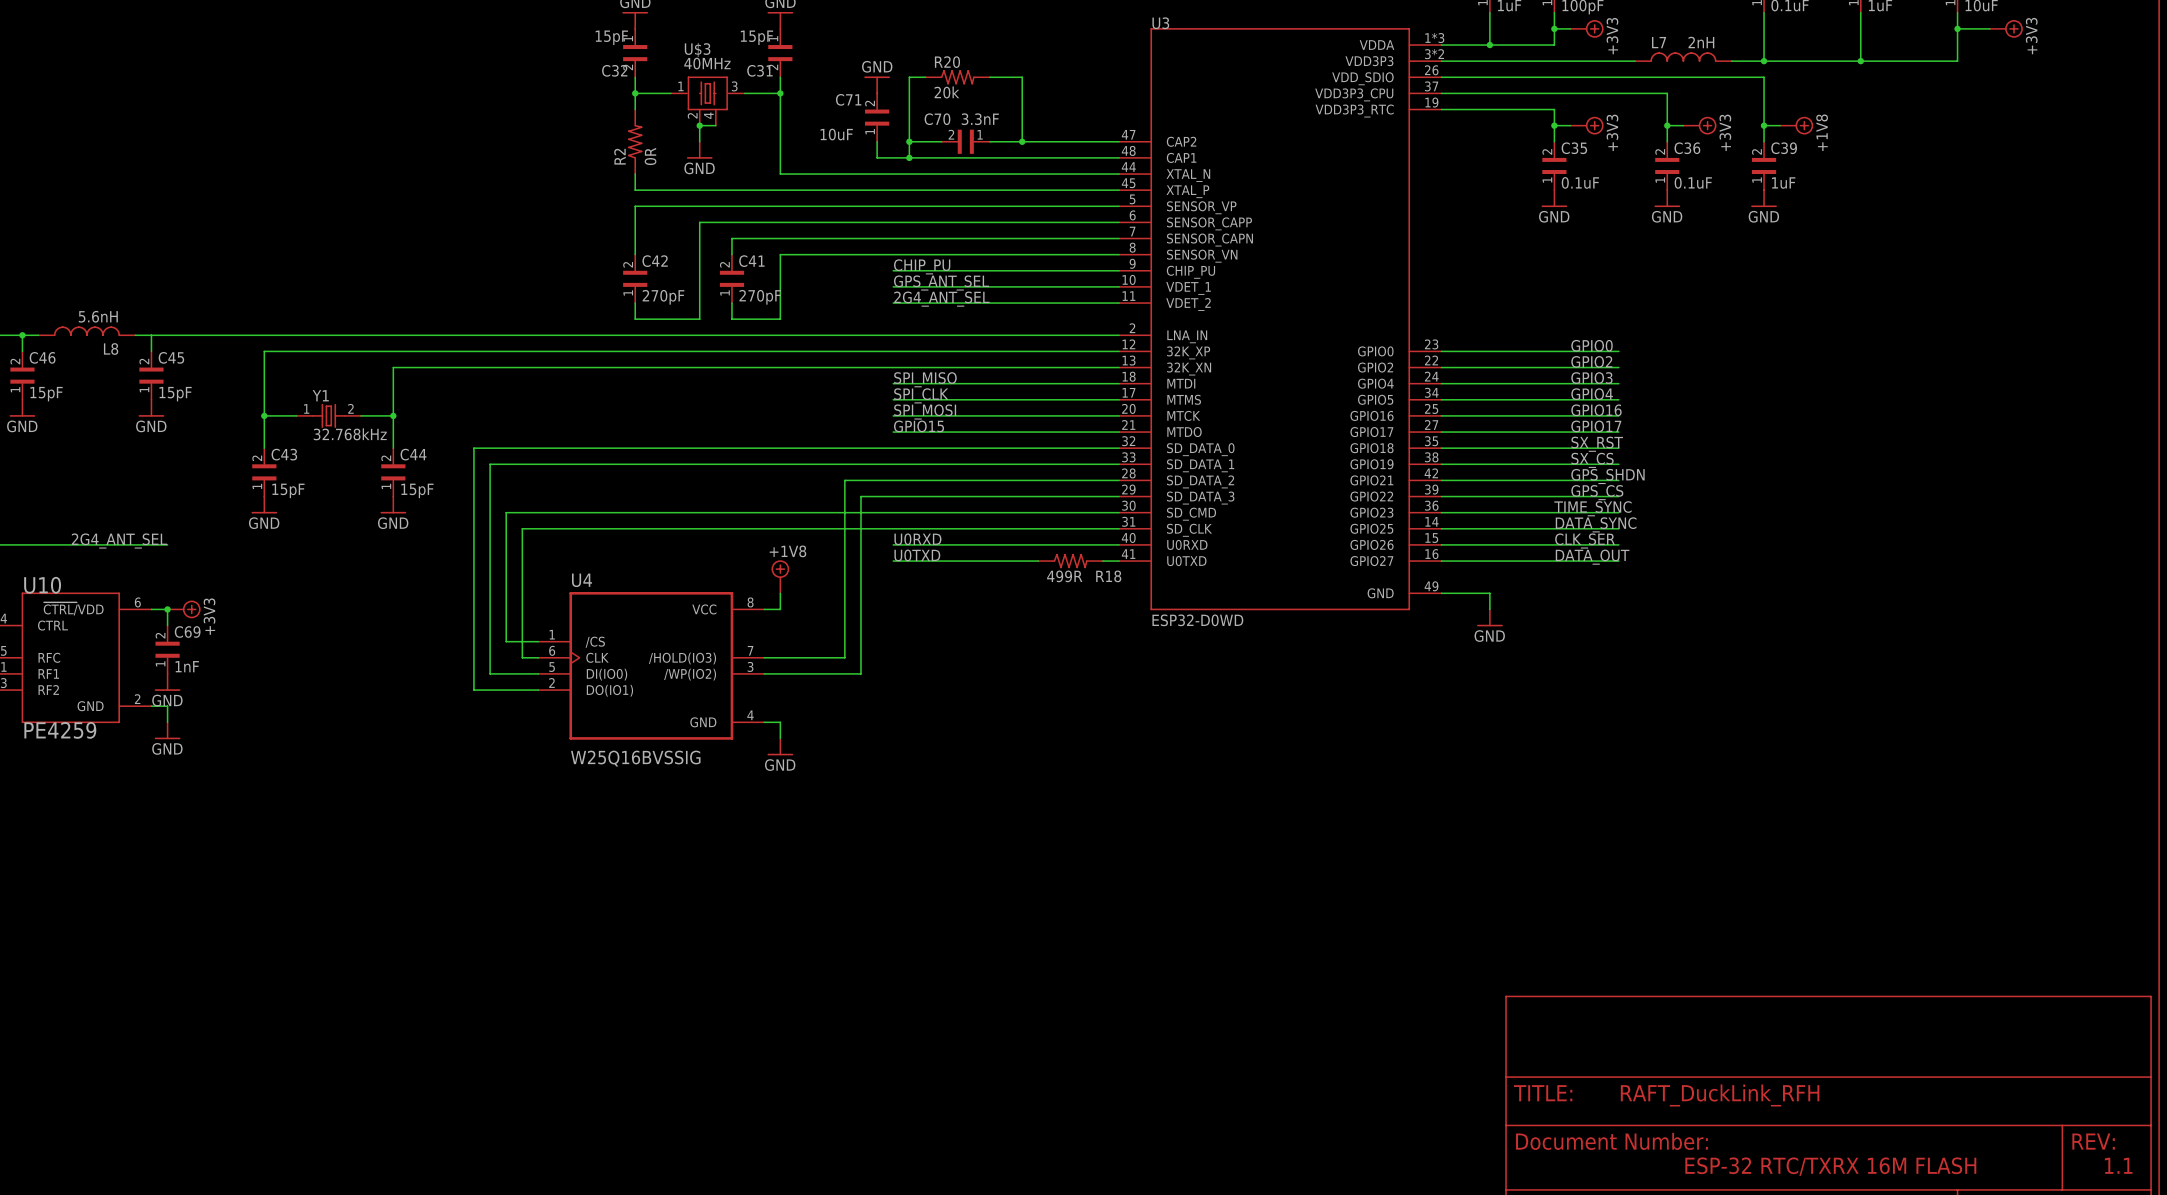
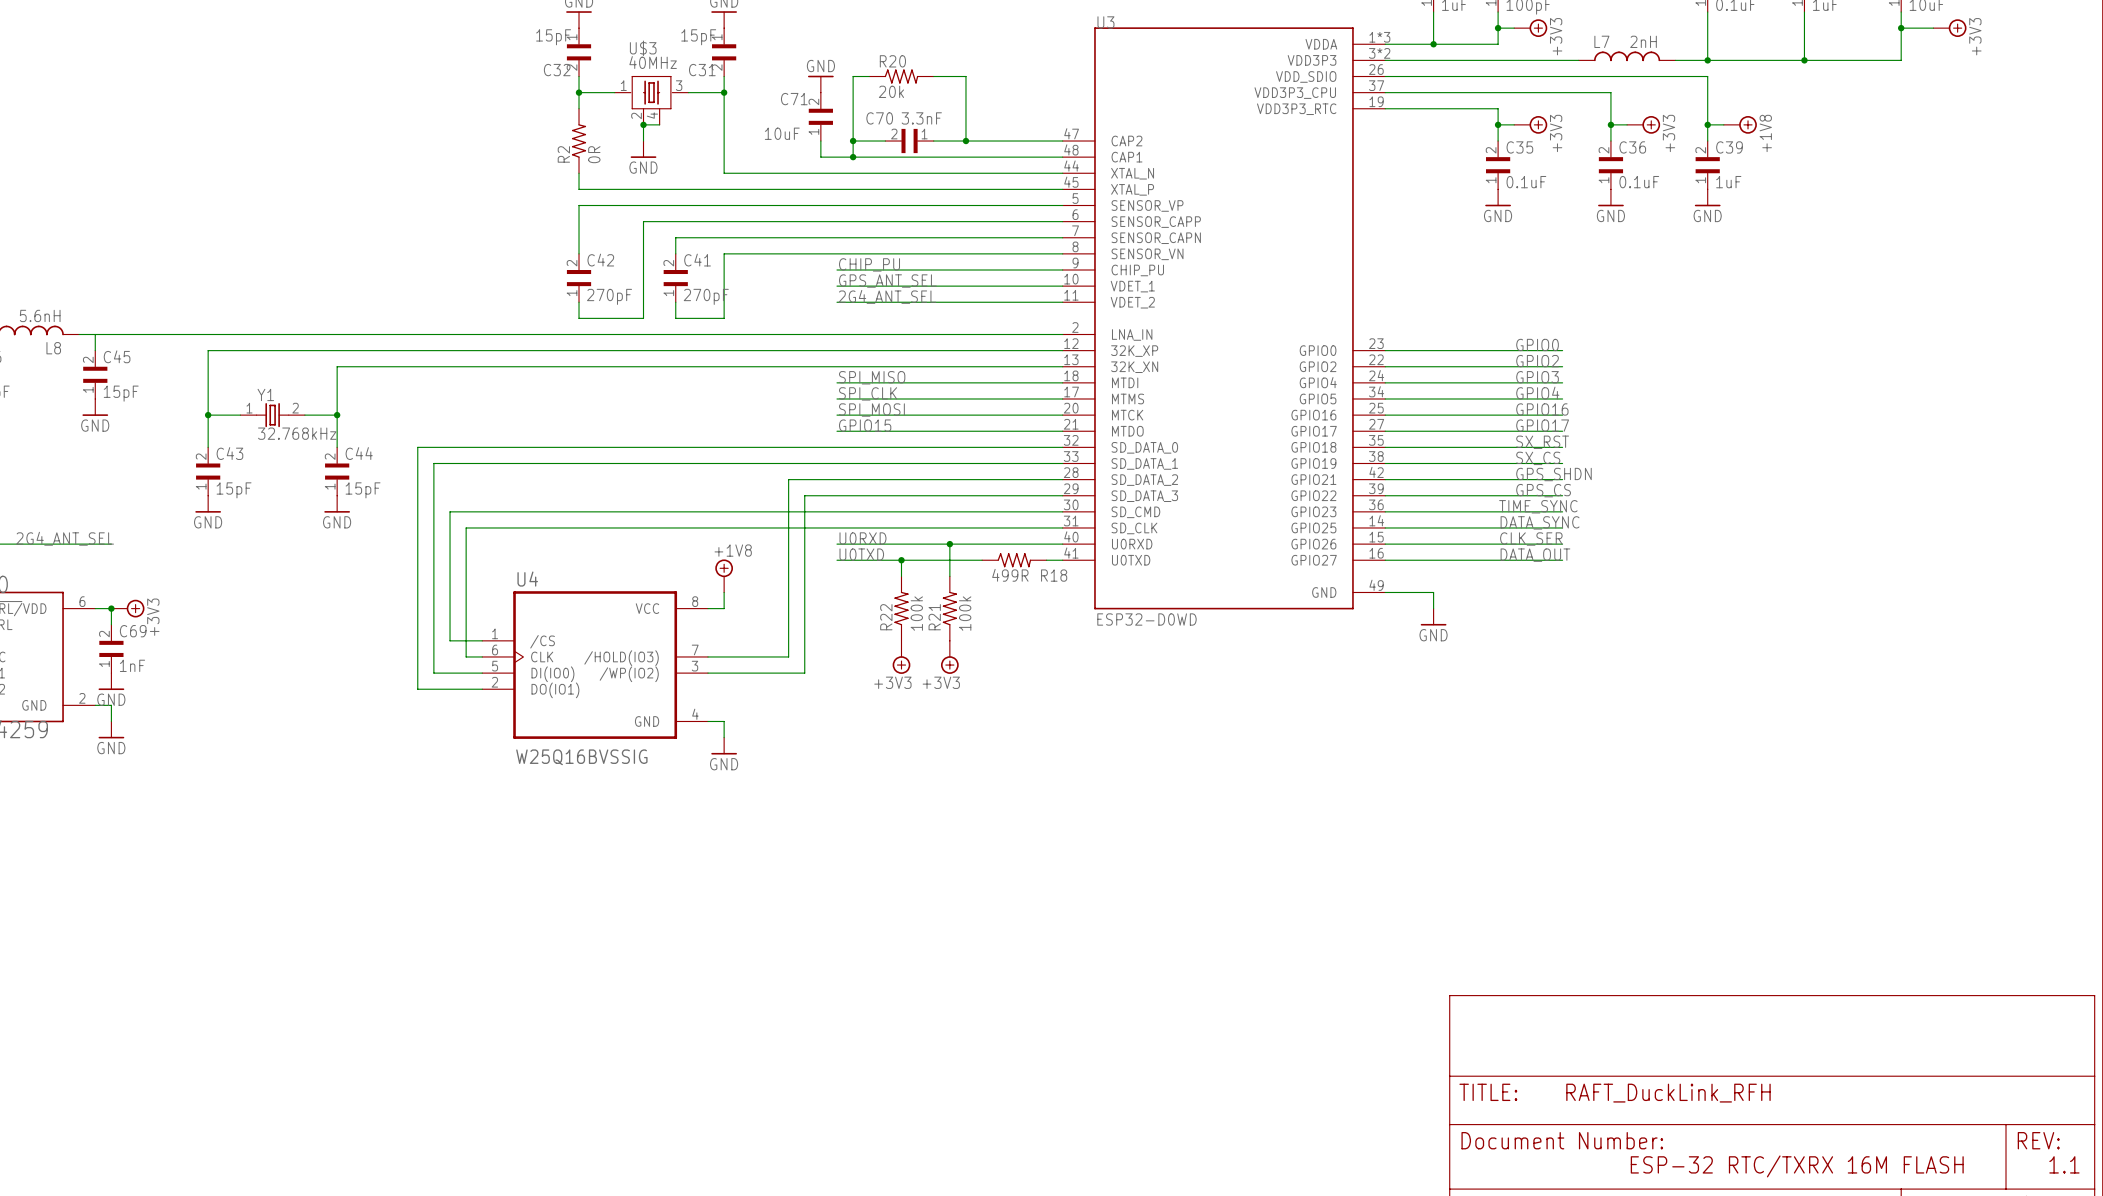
wire: none -> (949, 544) (949, 576)
junction: none -> (949, 544)
wire: none -> (901, 560) (901, 576)
junction: none -> (901, 560)
R22: none -> 100k (901, 608)
R21: none -> 100k (949, 608)
power symbol: none -> +3V3 (901, 657)
power symbol: none -> +3V3 (949, 657)

